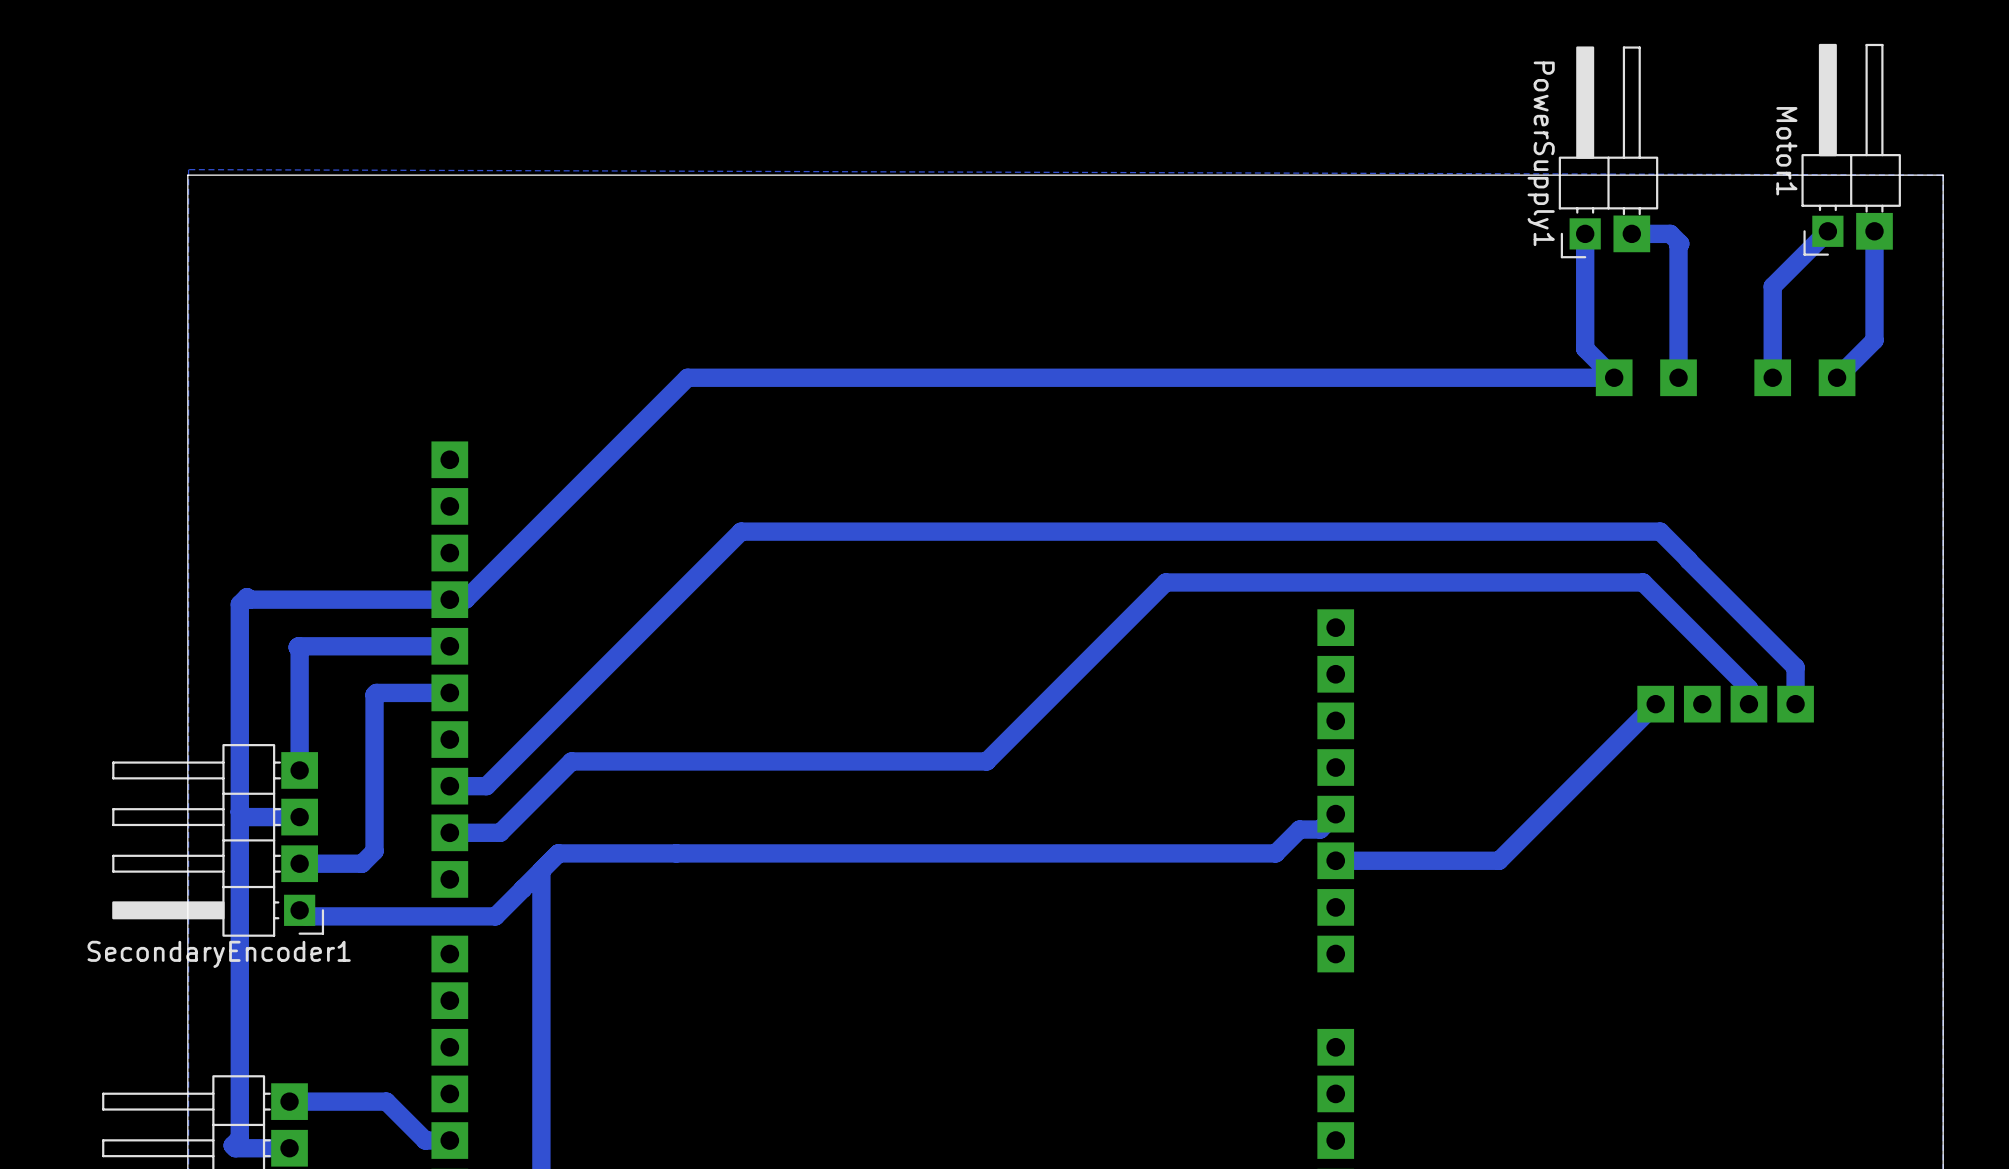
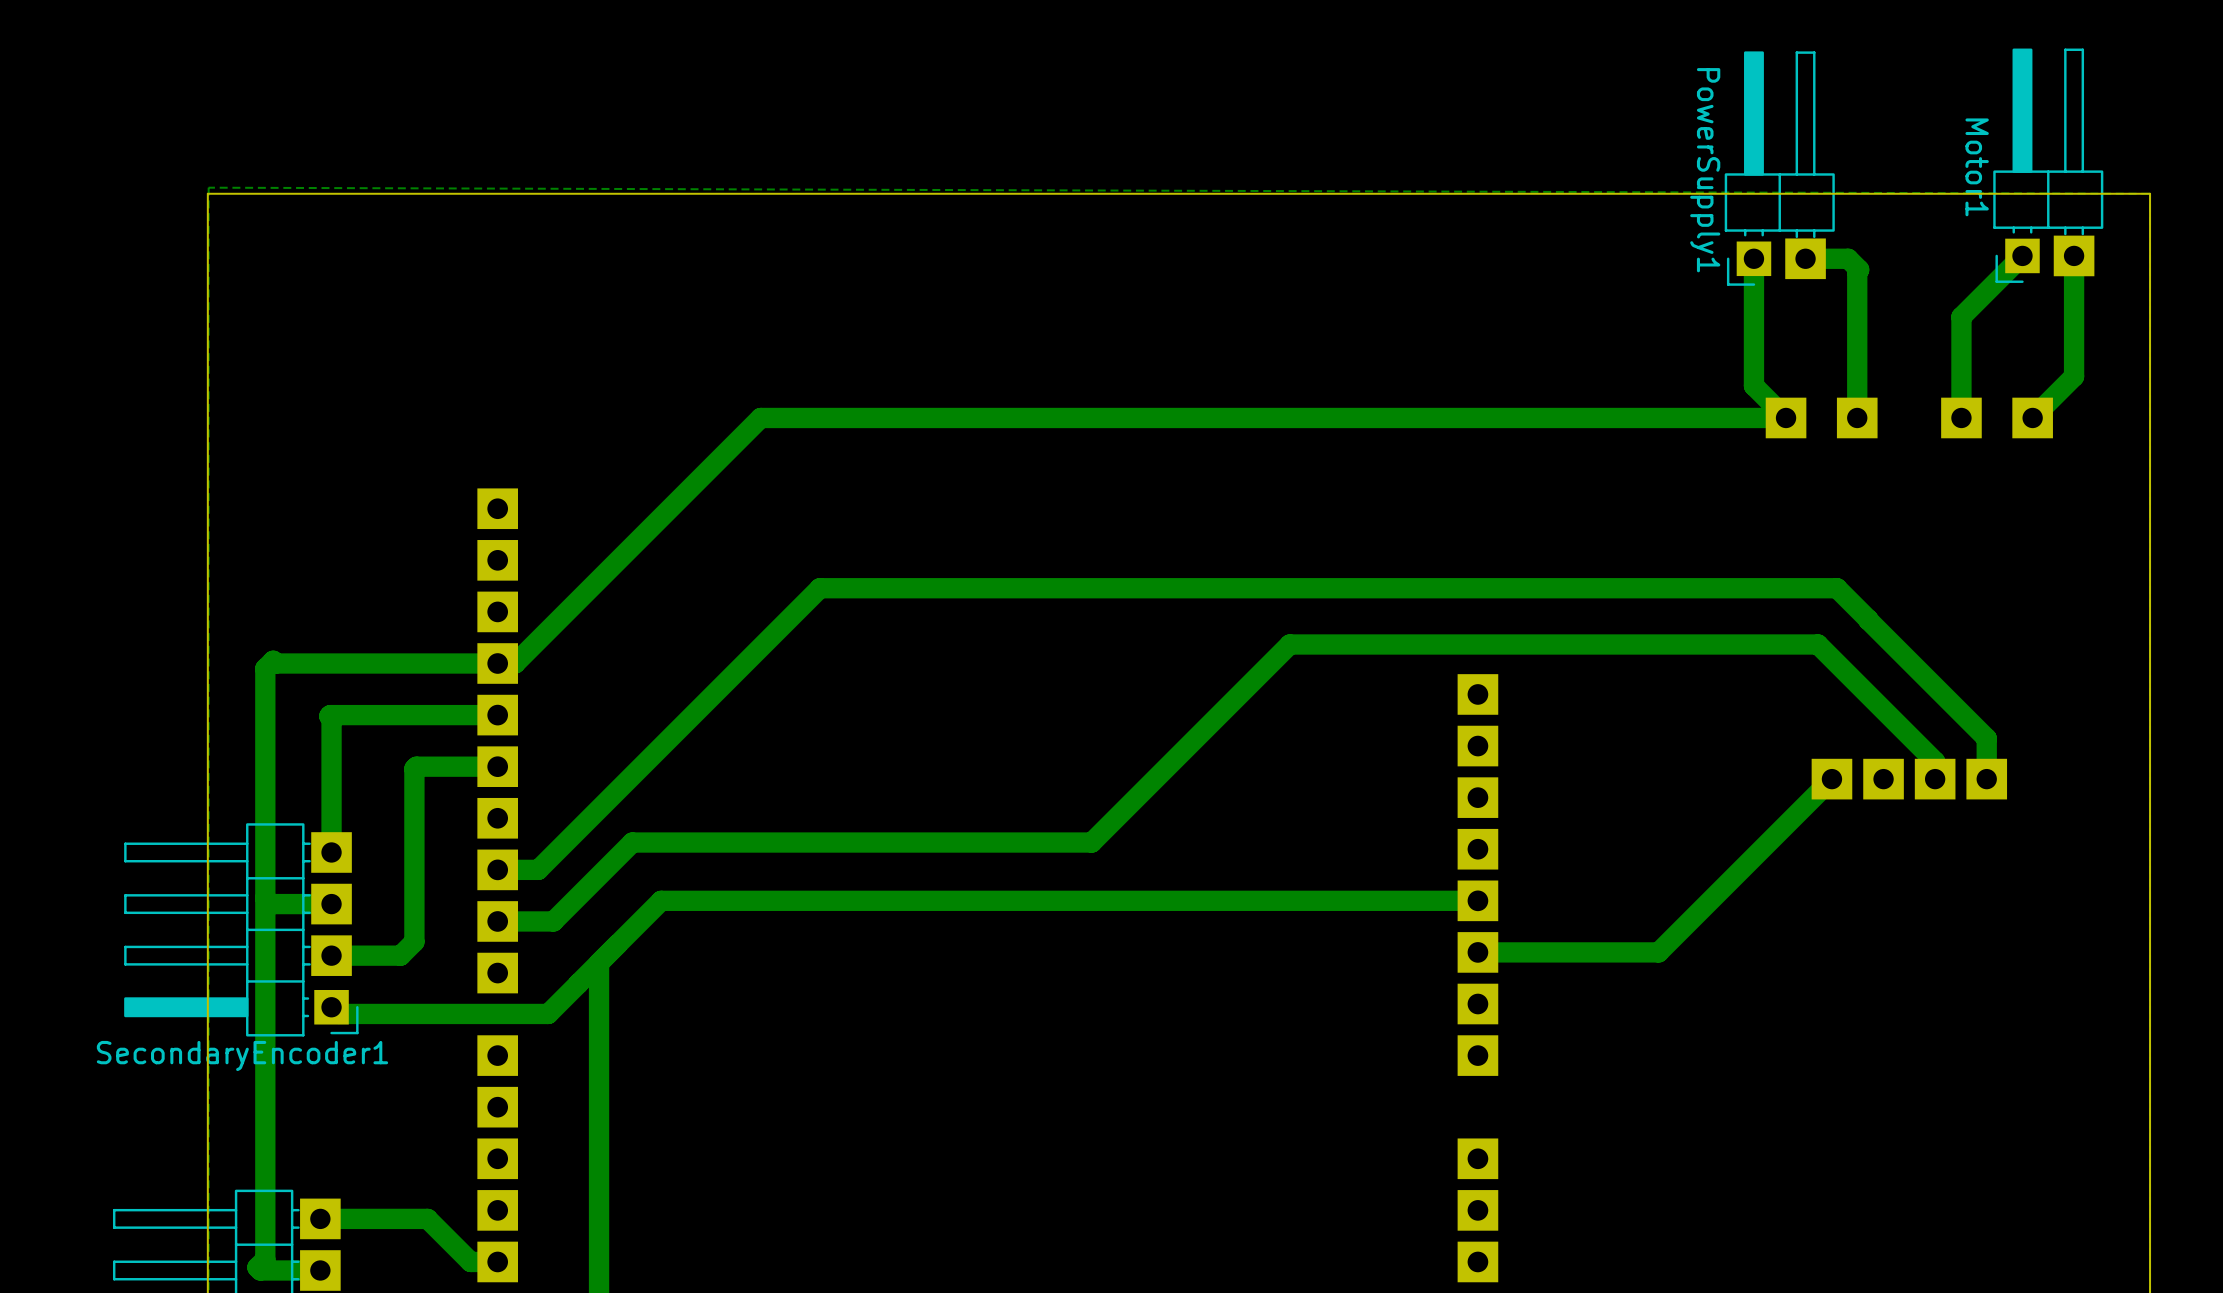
track: (1335, 814) (1320, 829) (1299, 829) (1275, 853) (558, 853) -> (1477, 900) (661, 900) (617, 944)

